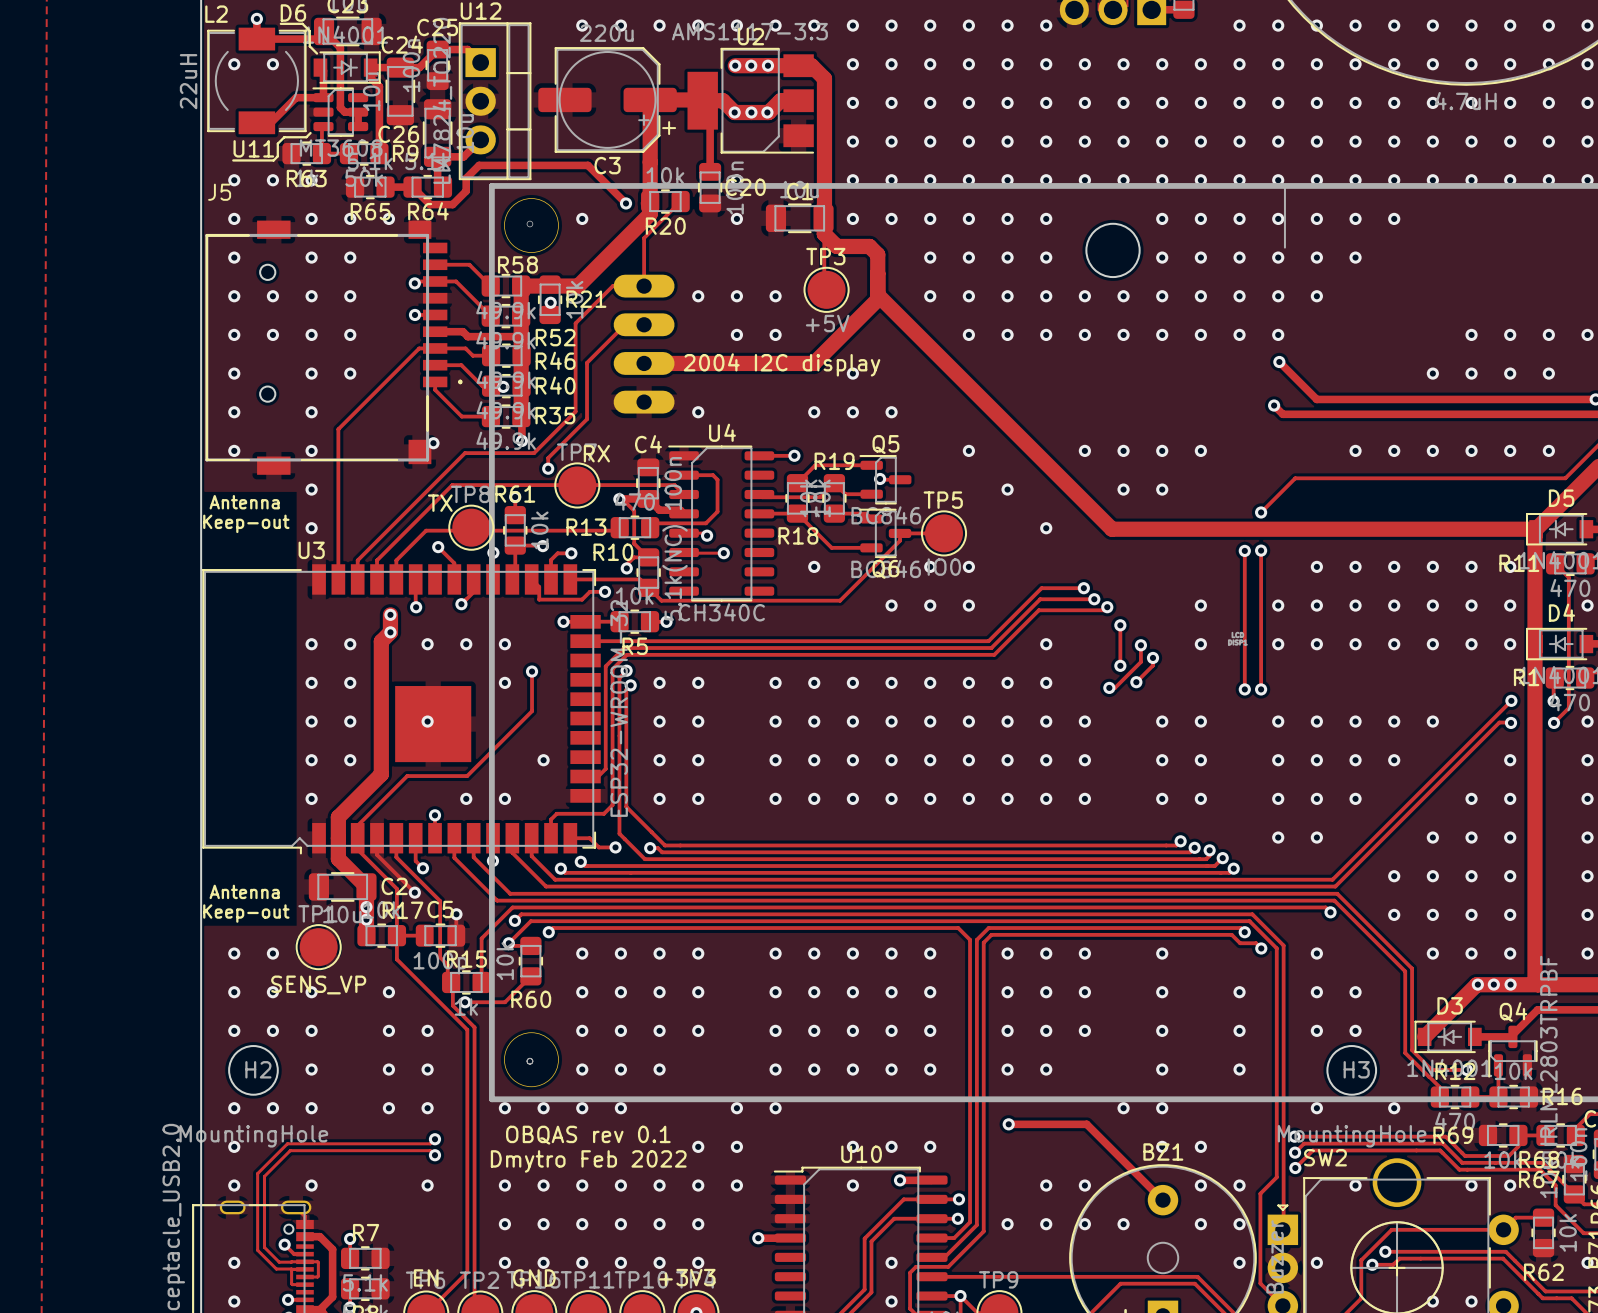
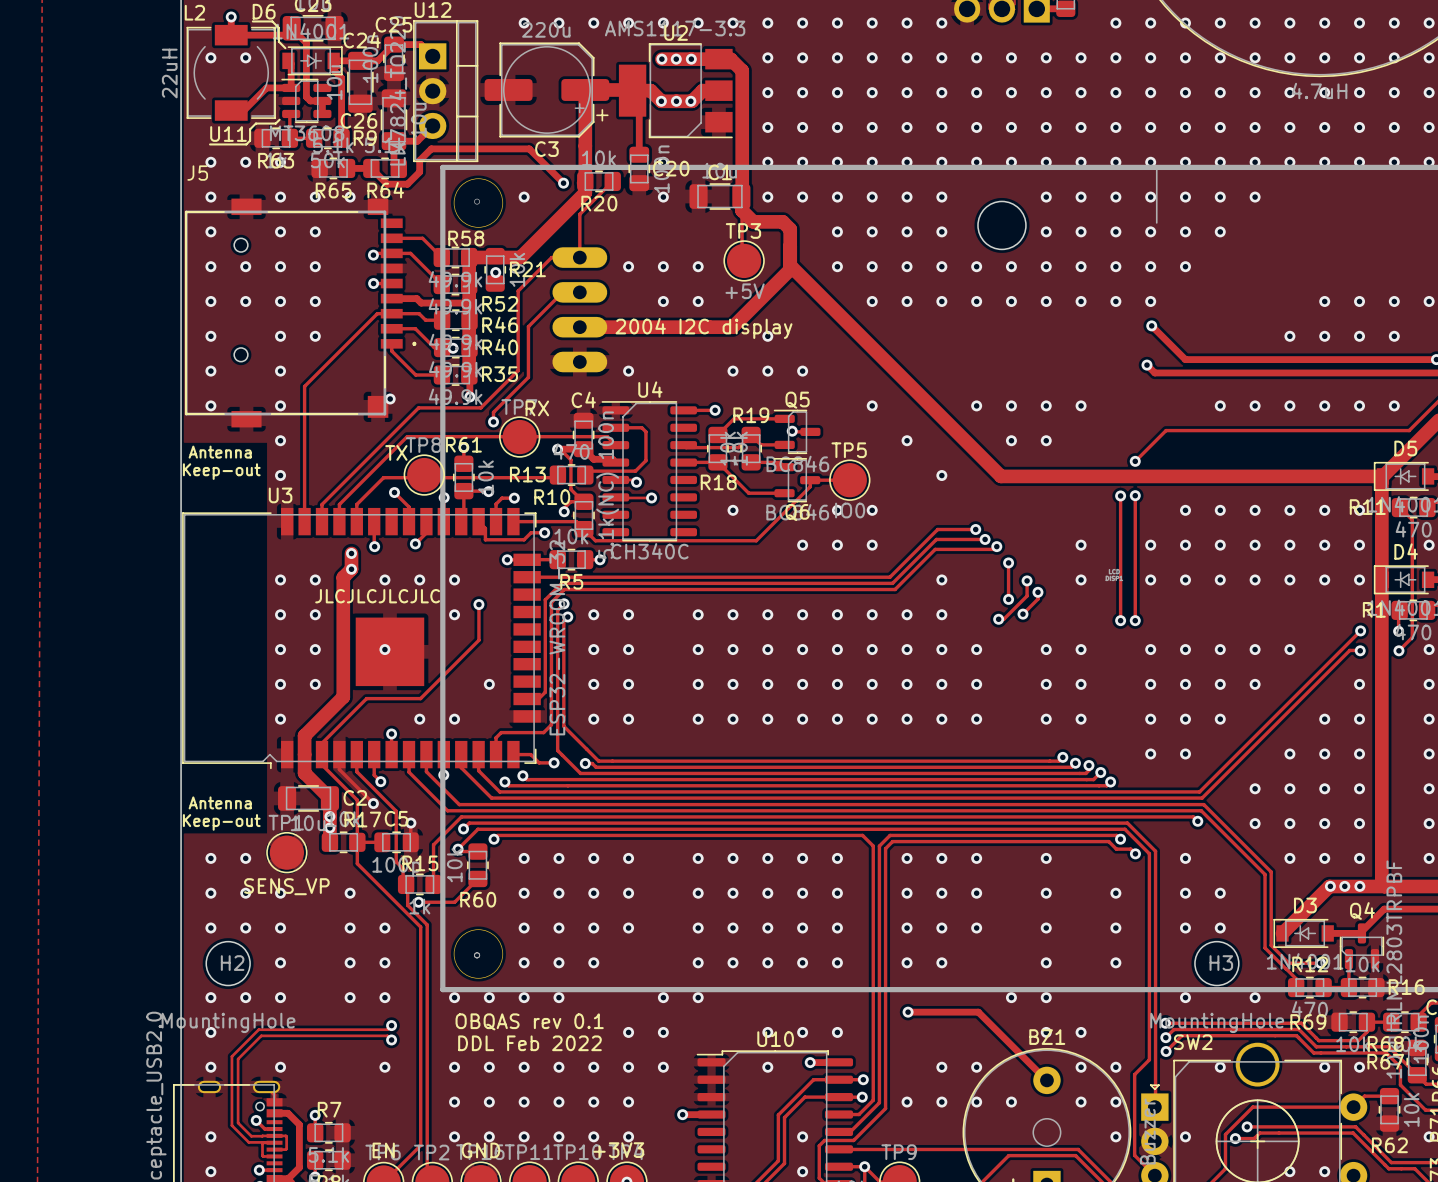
text: none -> JLCJLCJLCJLC (377, 596)
text: Dmytro Feb 2022 (588, 1161) -> DDL Feb 2022 (529, 1043)

